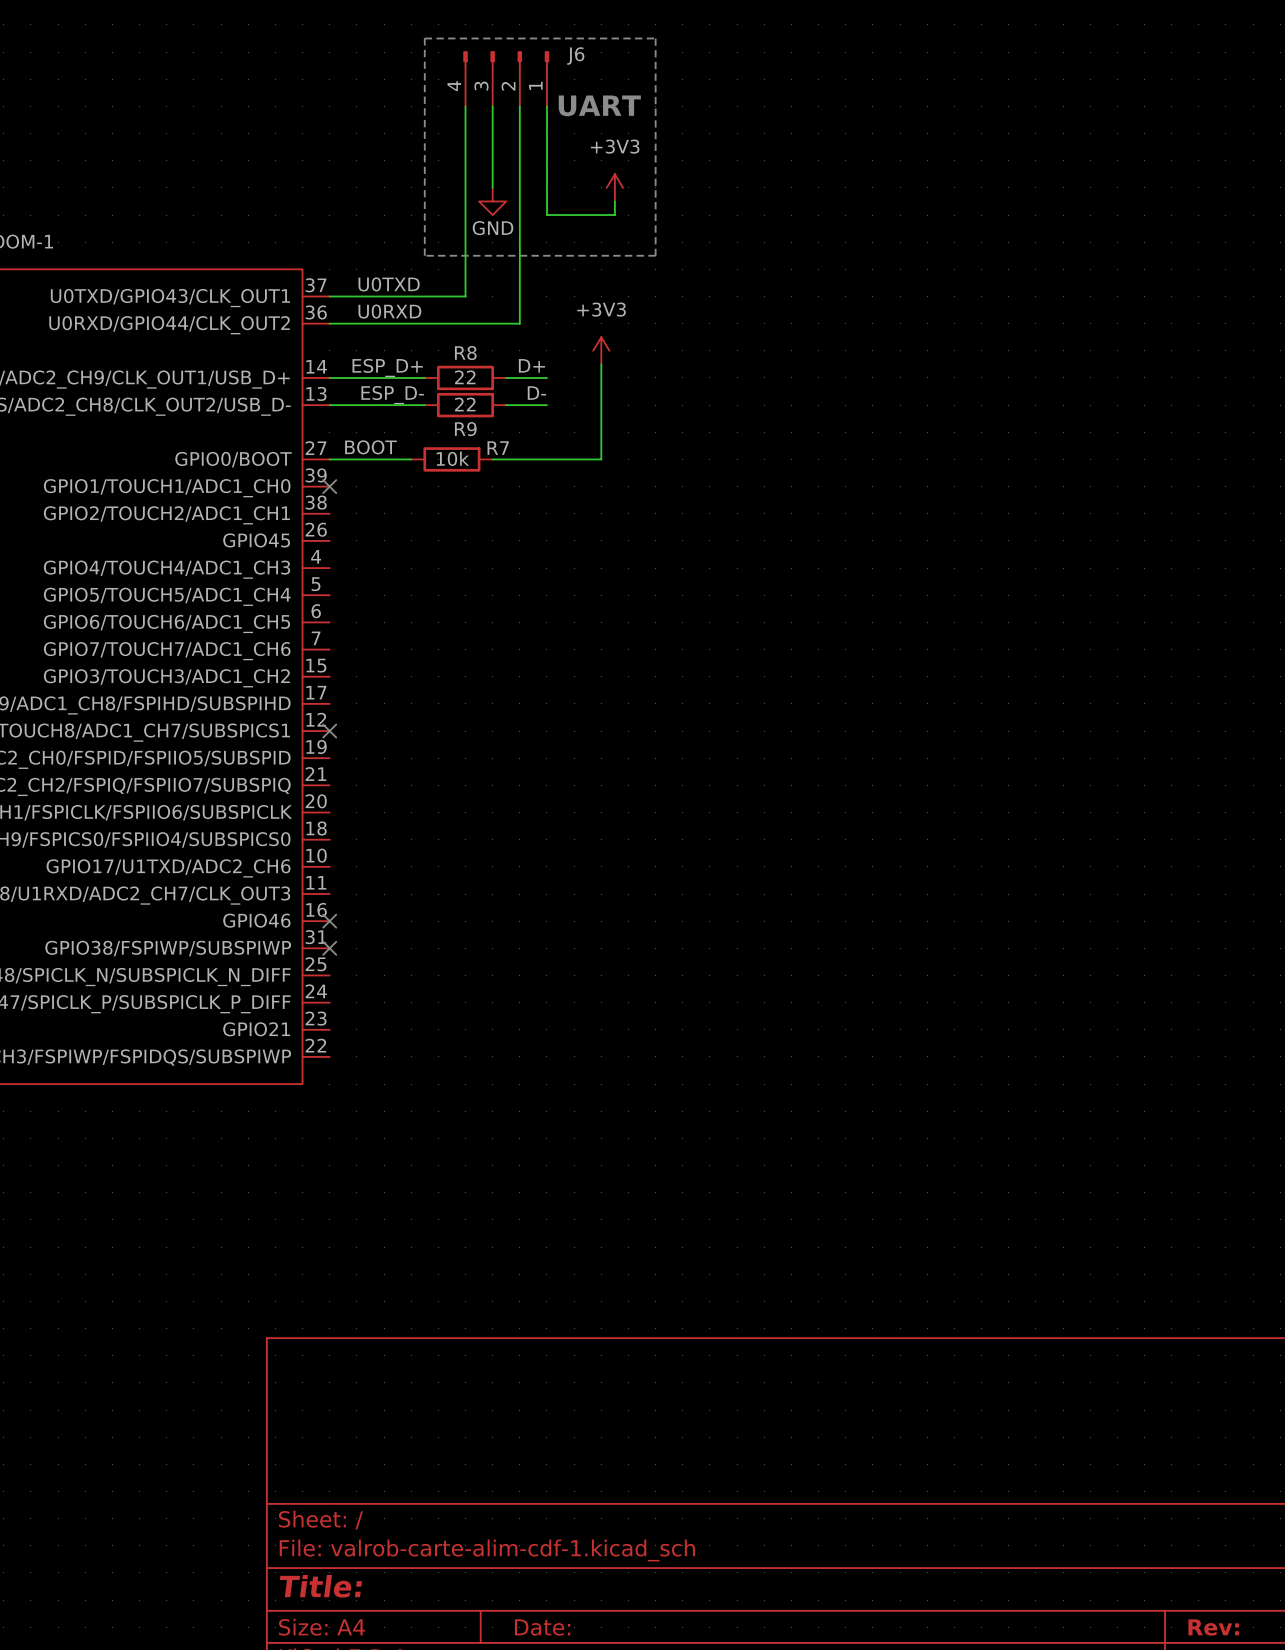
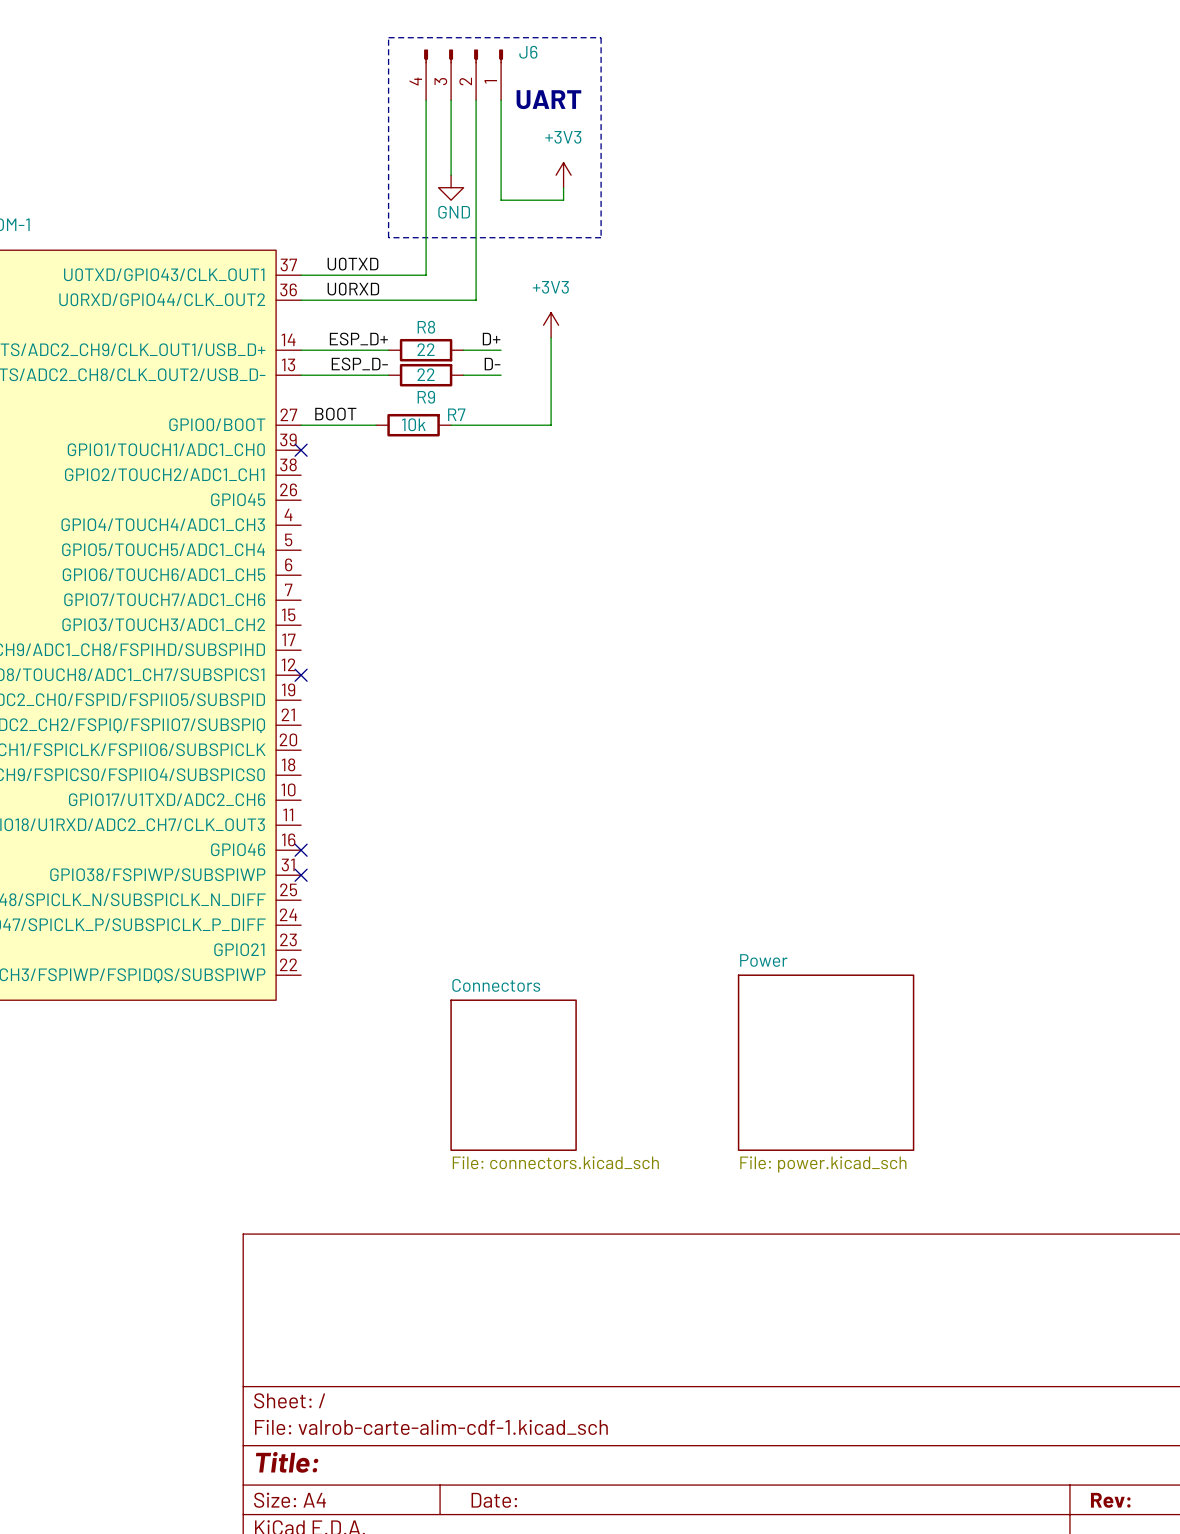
sheet Power: none -> File: power.kicad_sch (826, 1062)
sheet Connectors: none -> File: connectors.kicad_sch (513, 1075)

